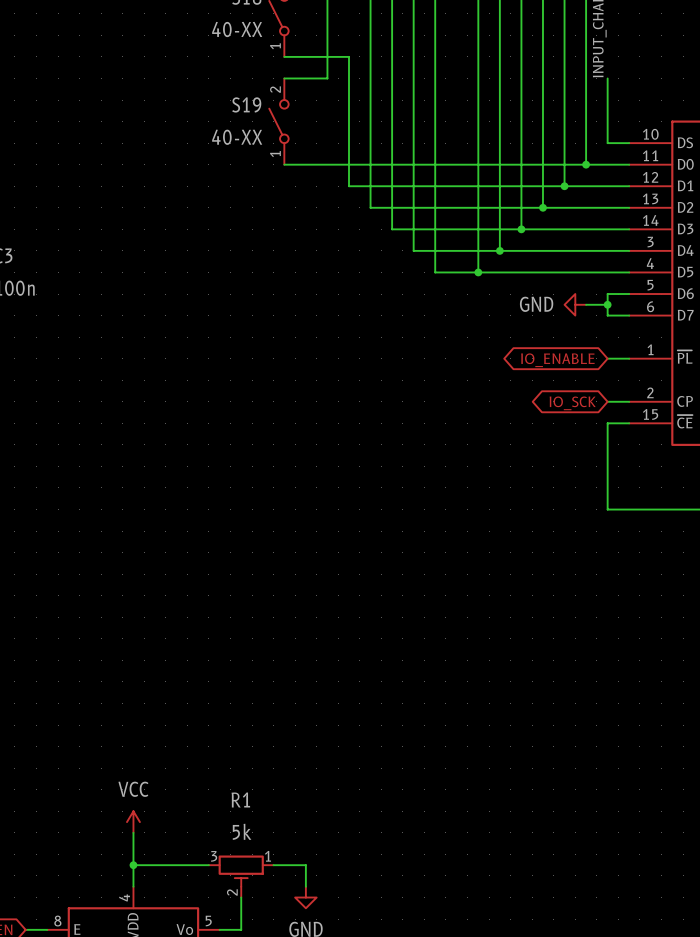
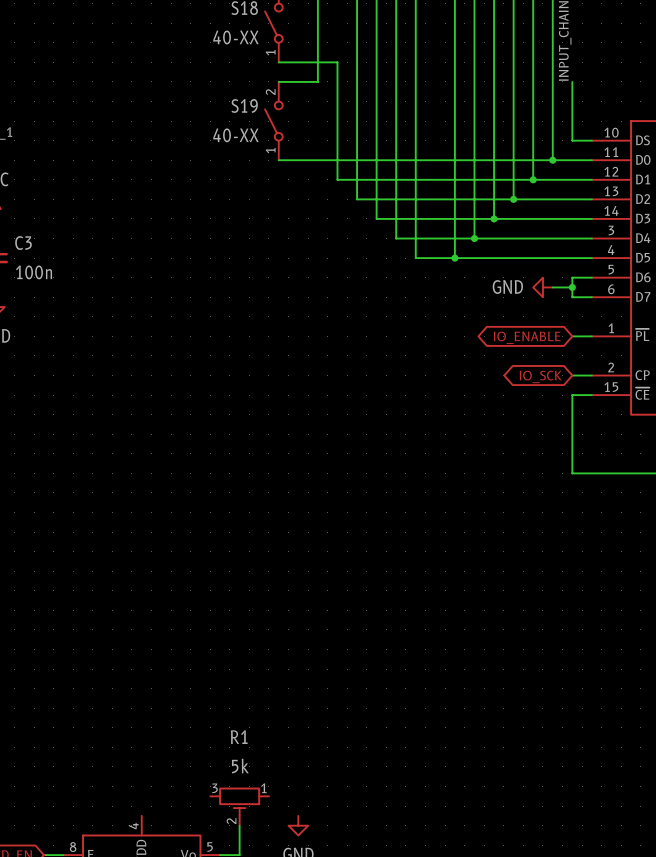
power symbol: VCC (133, 822) -> none
wire: (133, 832) (133, 886) -> none
wire: (133, 865) (208, 865) -> none
junction: (133, 865) -> none
wire: (273, 865) (305, 865) (305, 886) -> none

